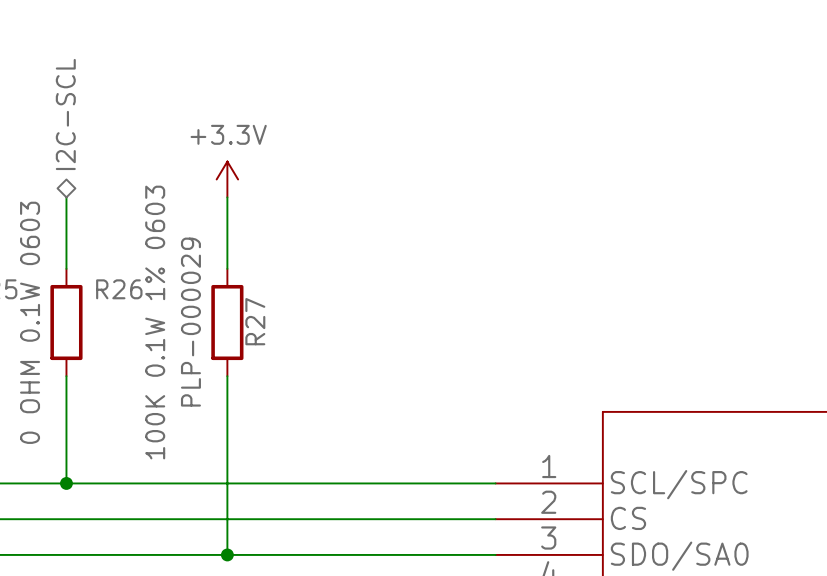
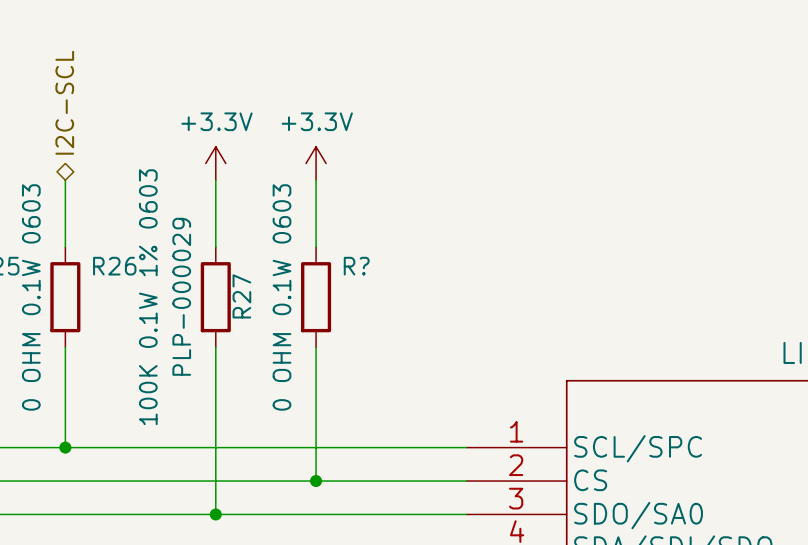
power symbol: none -> +3.3V (316, 163)
wire: none -> (316, 180) (316, 247)
R?: none -> (316, 297)
wire: none -> (316, 347) (316, 481)
junction: none -> (316, 481)

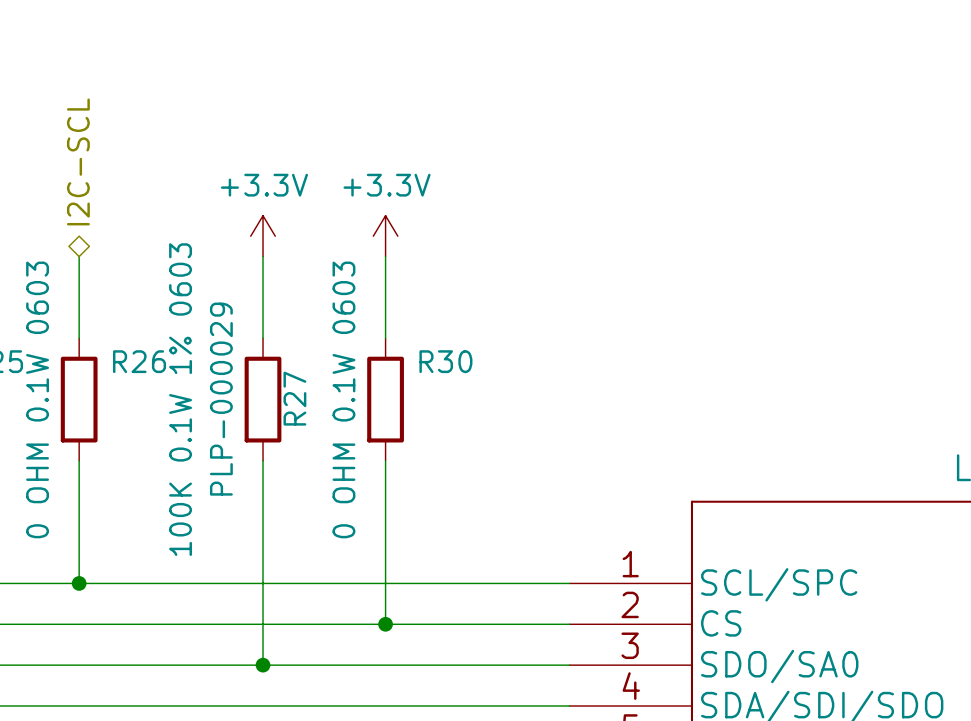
R? name: R? (356, 266) -> R30 (445, 361)

